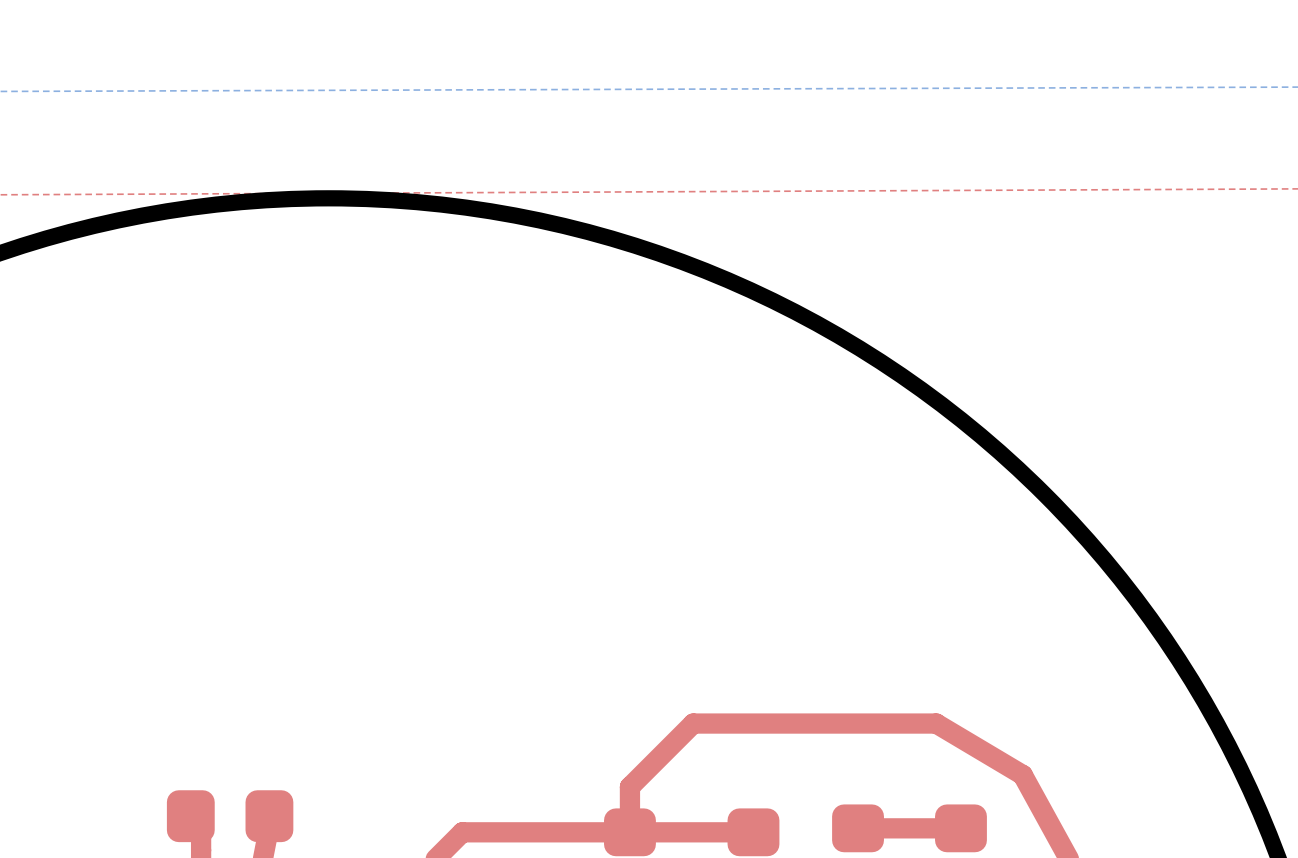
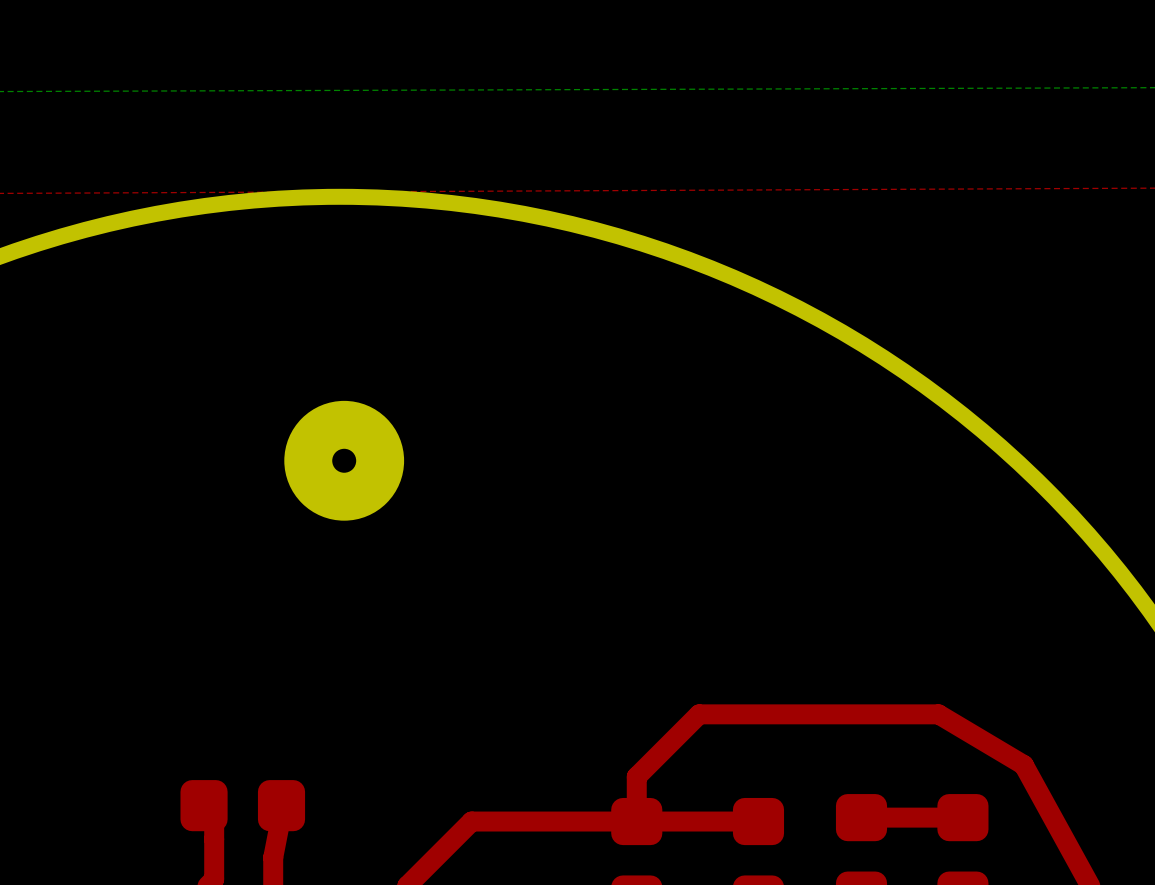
part: none -> (344, 460)

